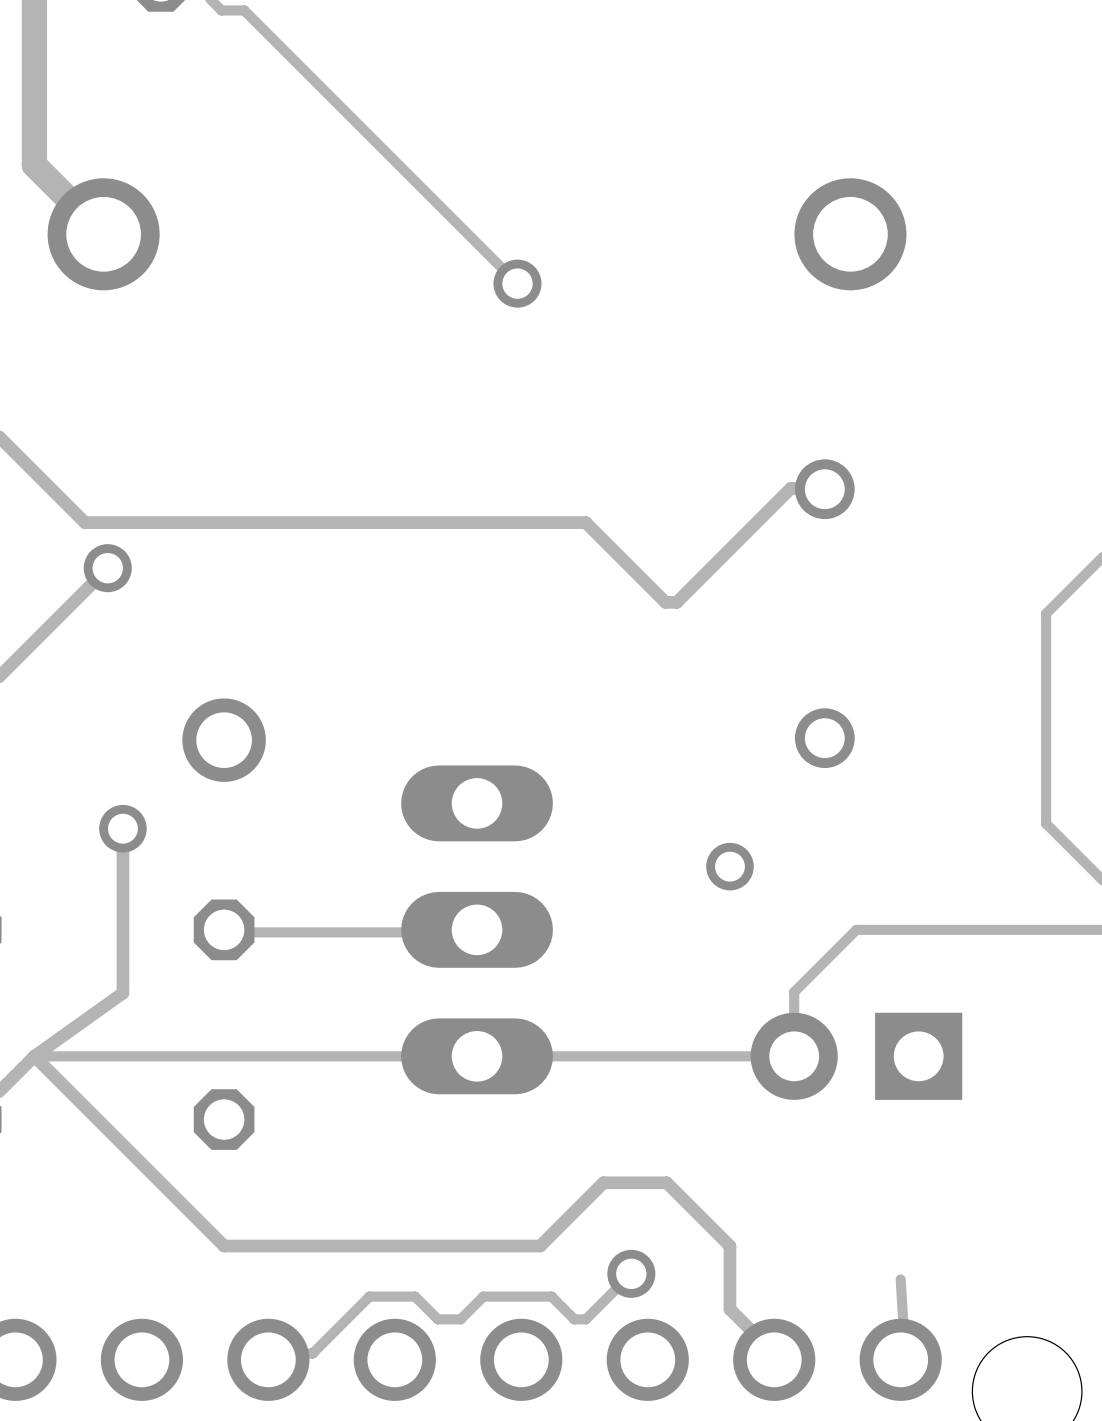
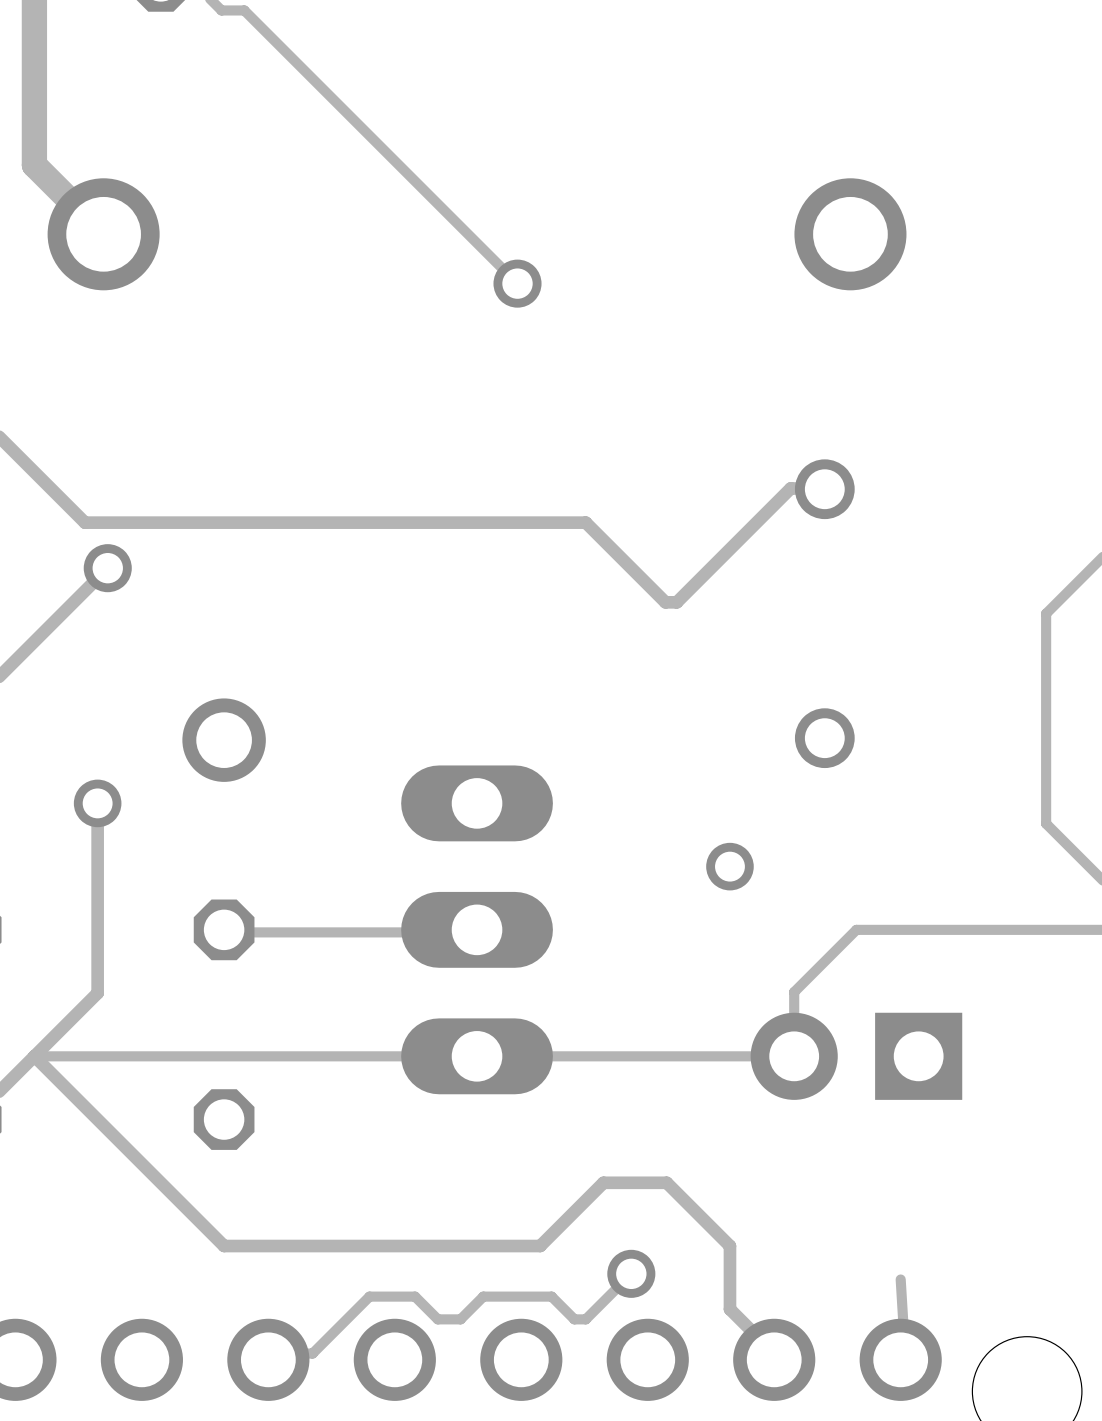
track: (122, 828) (122, 993) (34, 1056) -> (97, 803) (97, 993) (34, 1056)
via position: (122, 828) -> (97, 803)

